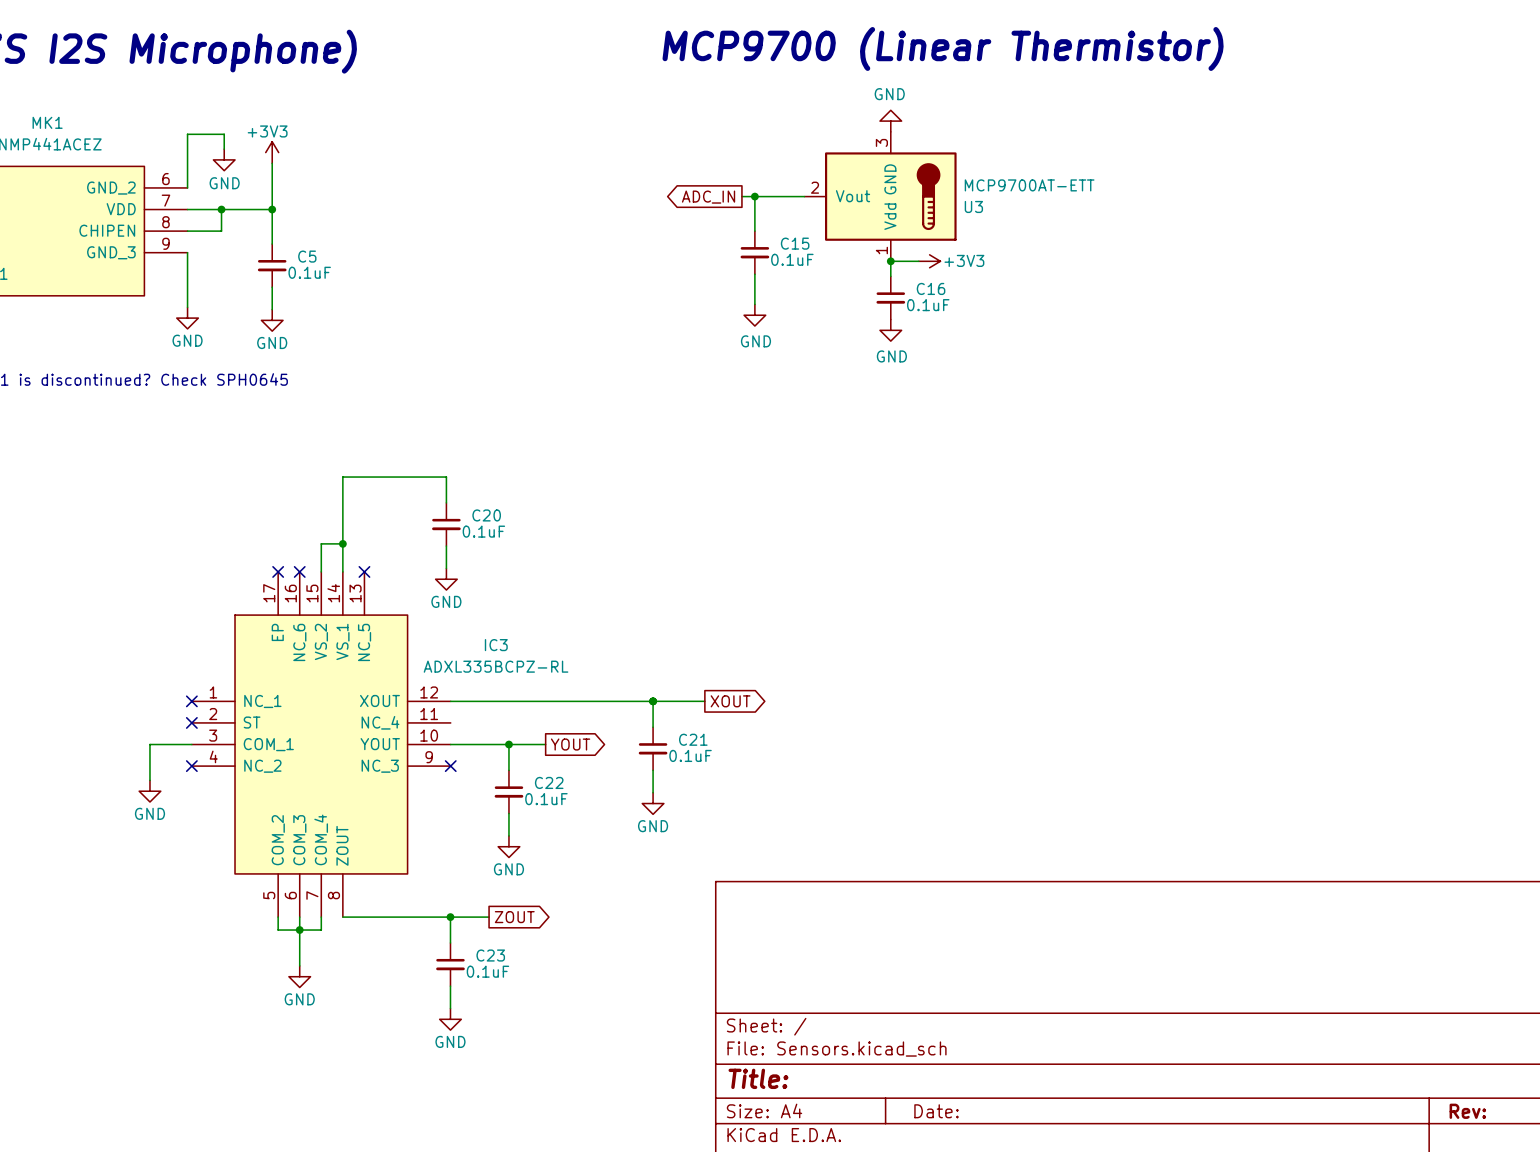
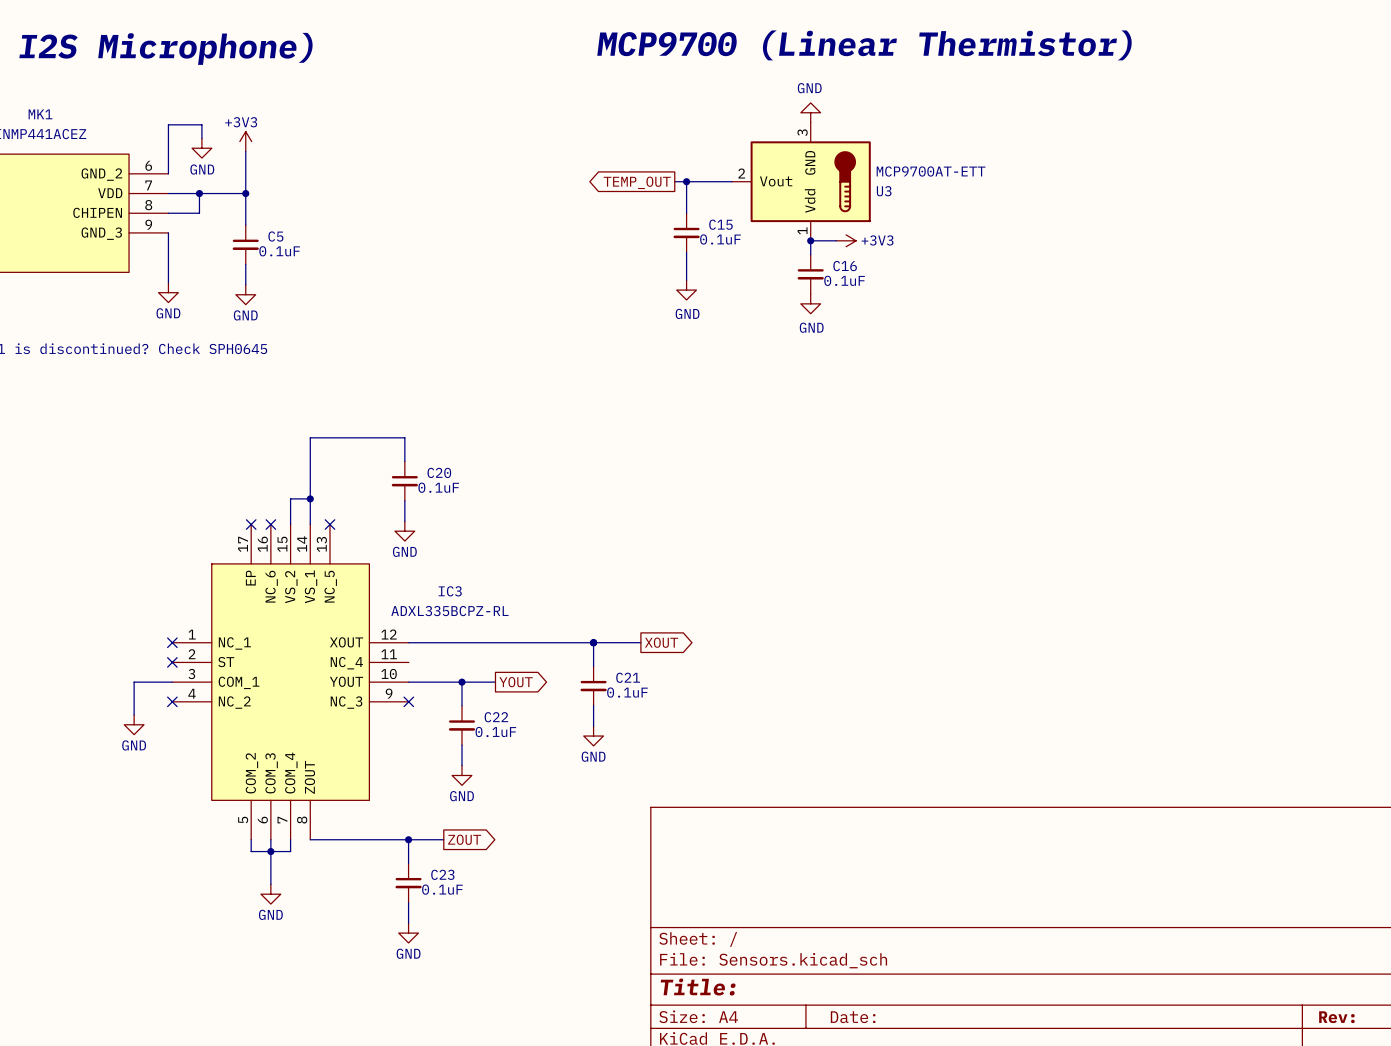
global label: ADC_IN (708, 197) -> TEMP_OUT (637, 182)

